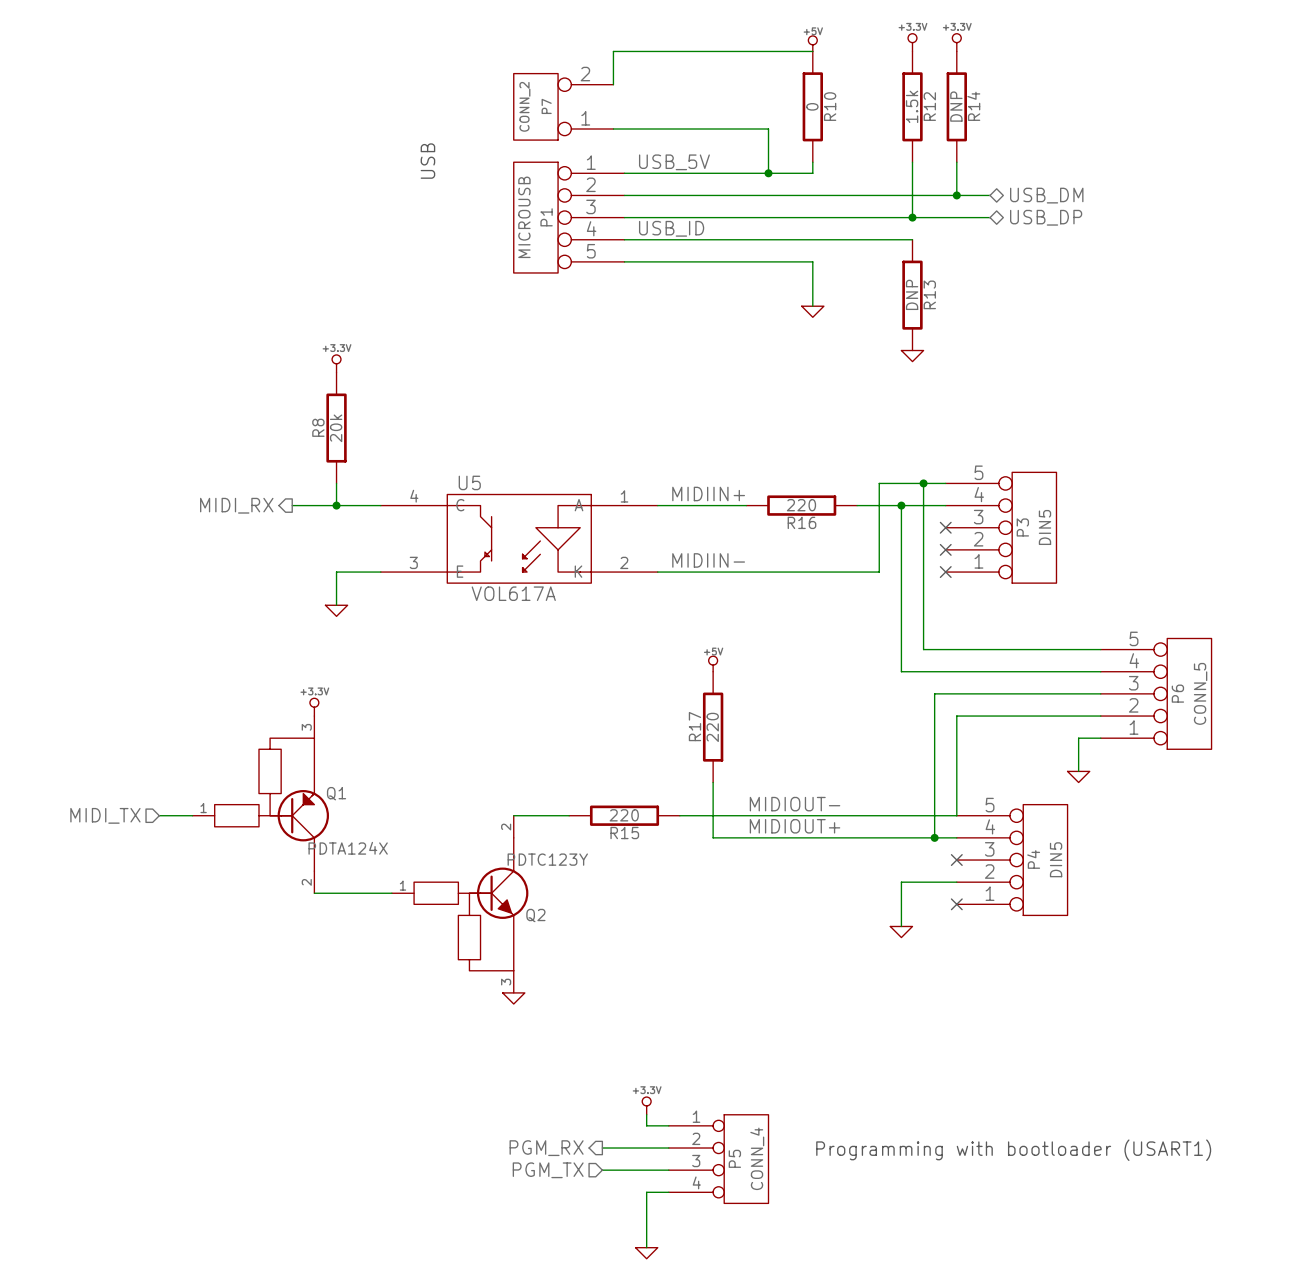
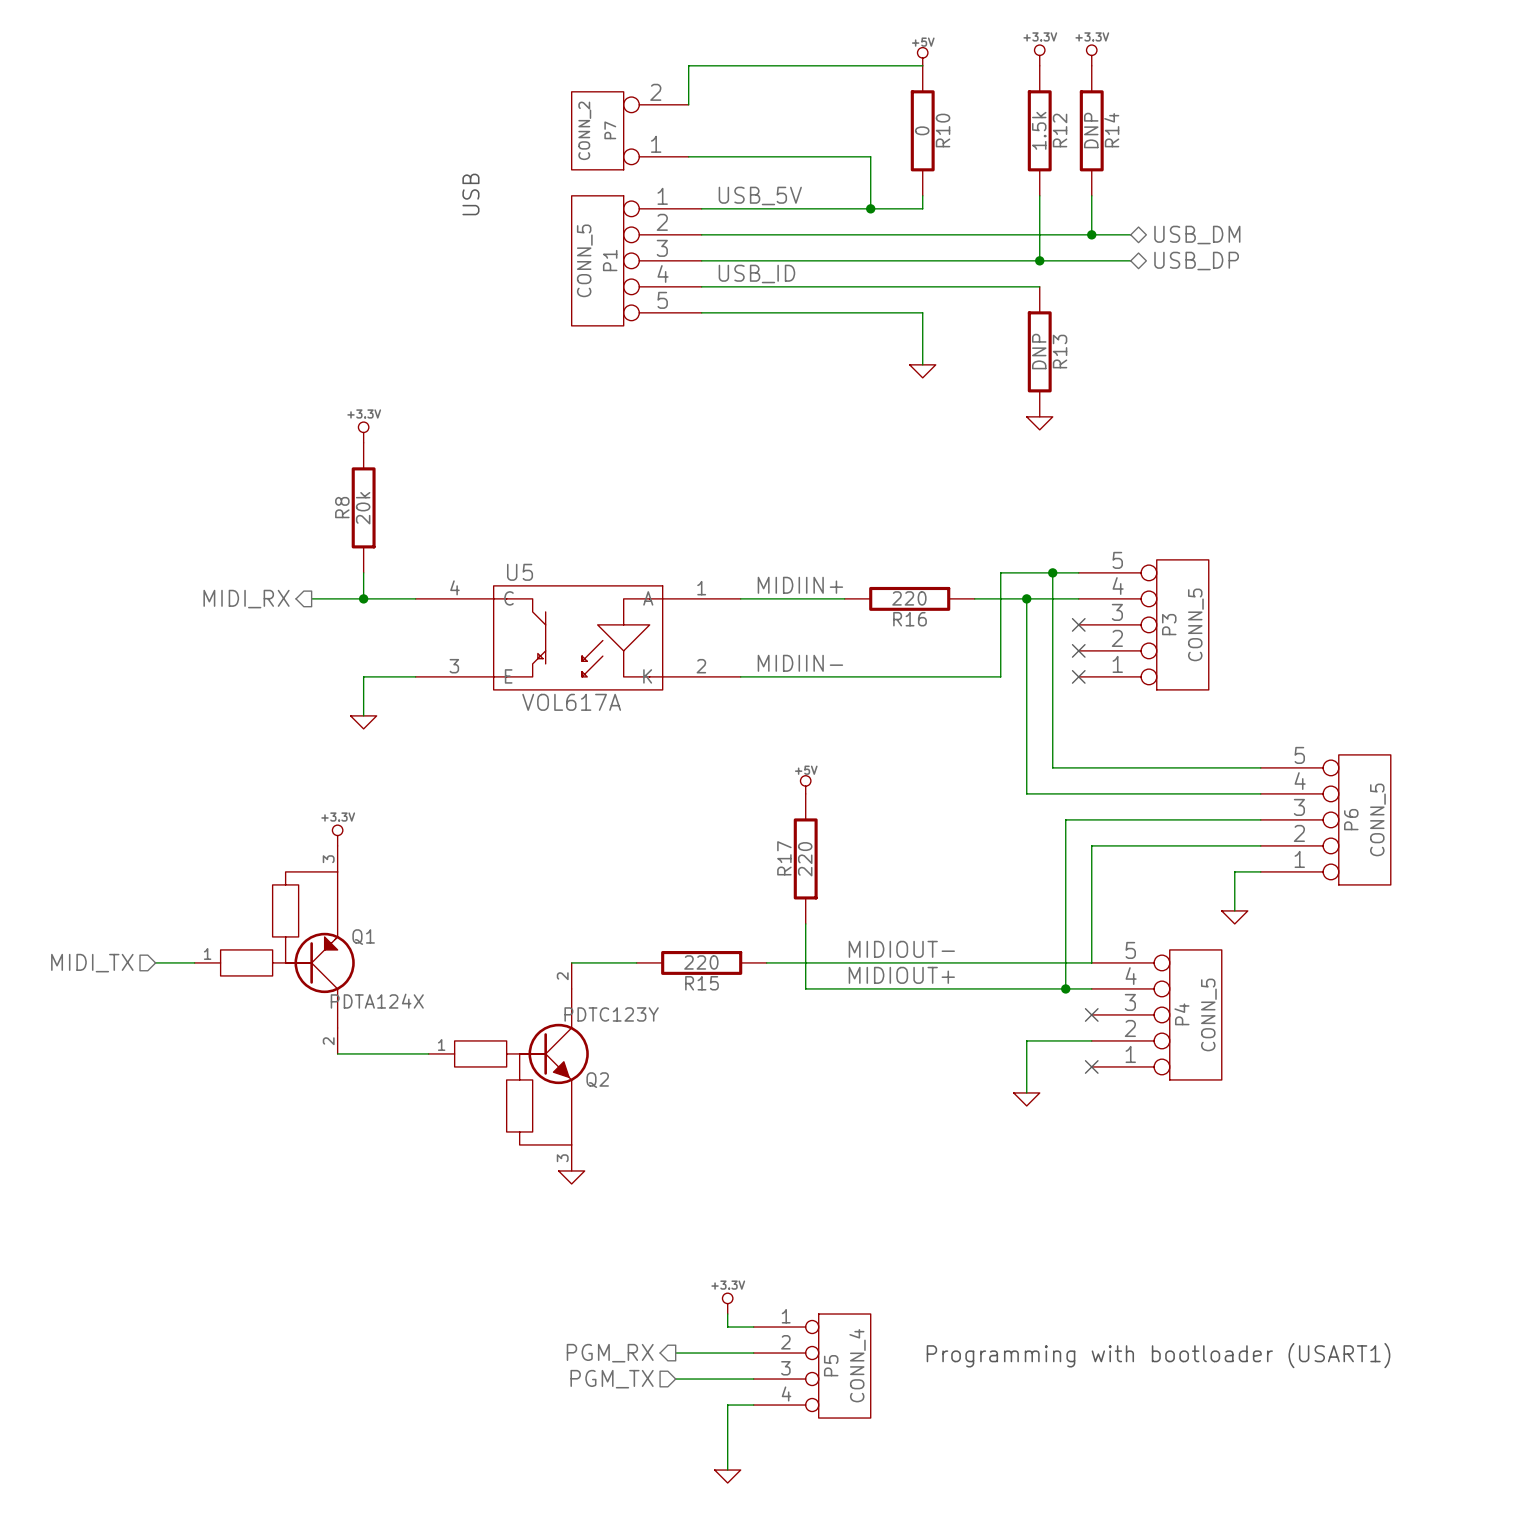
P1 value: MICROUSB (524, 217) -> CONN_5 (584, 260)
P3 value: DIN5 (1044, 527) -> CONN_5 (1195, 624)
P4 value: DIN5 (1056, 859) -> CONN_5 (1208, 1014)

